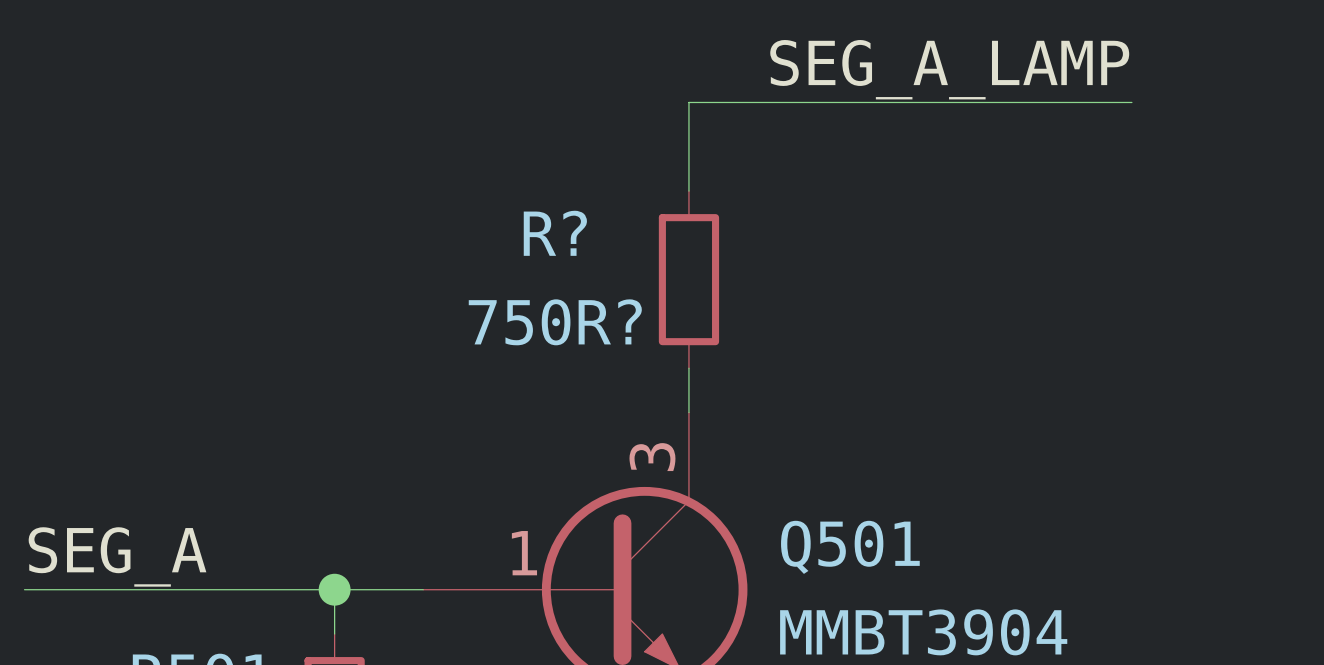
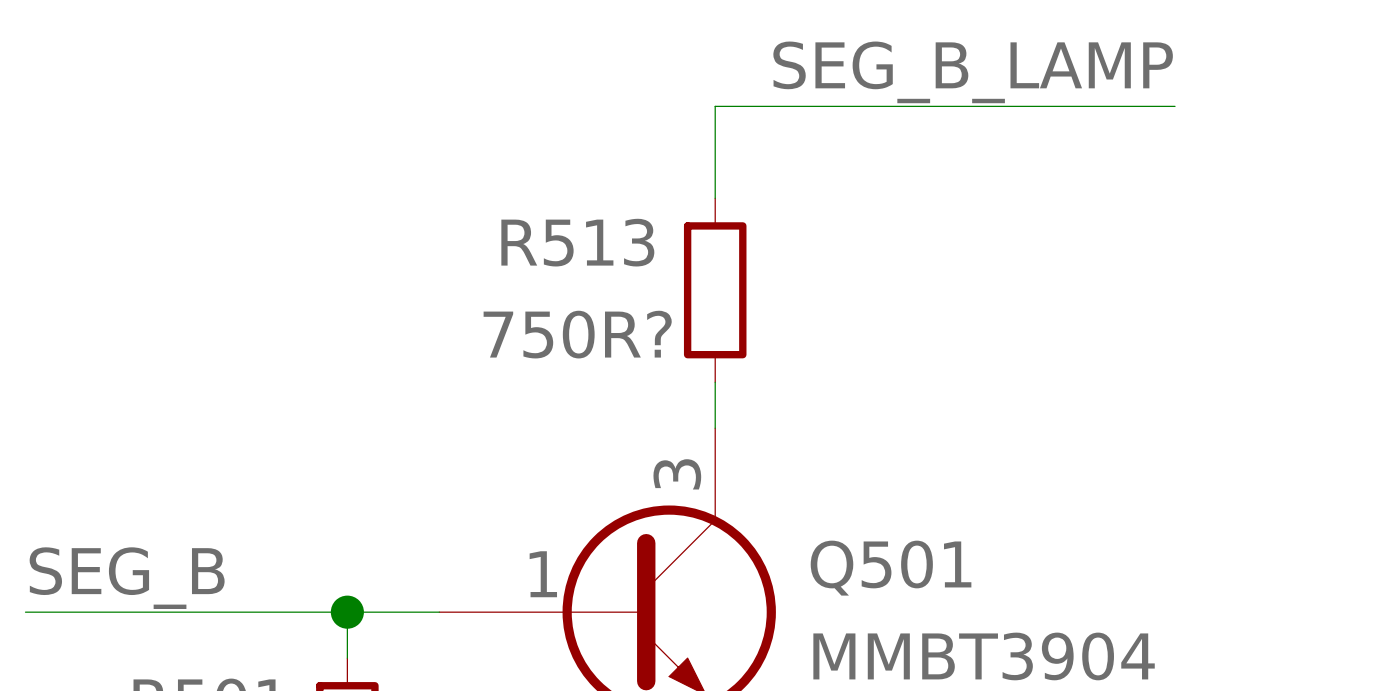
label: SEG_A_LAMP (949, 69) -> SEG_B_LAMP (973, 72)
R? name: R? (555, 233) -> R513 (577, 242)
label: SEG_A (117, 556) -> SEG_B (127, 578)

